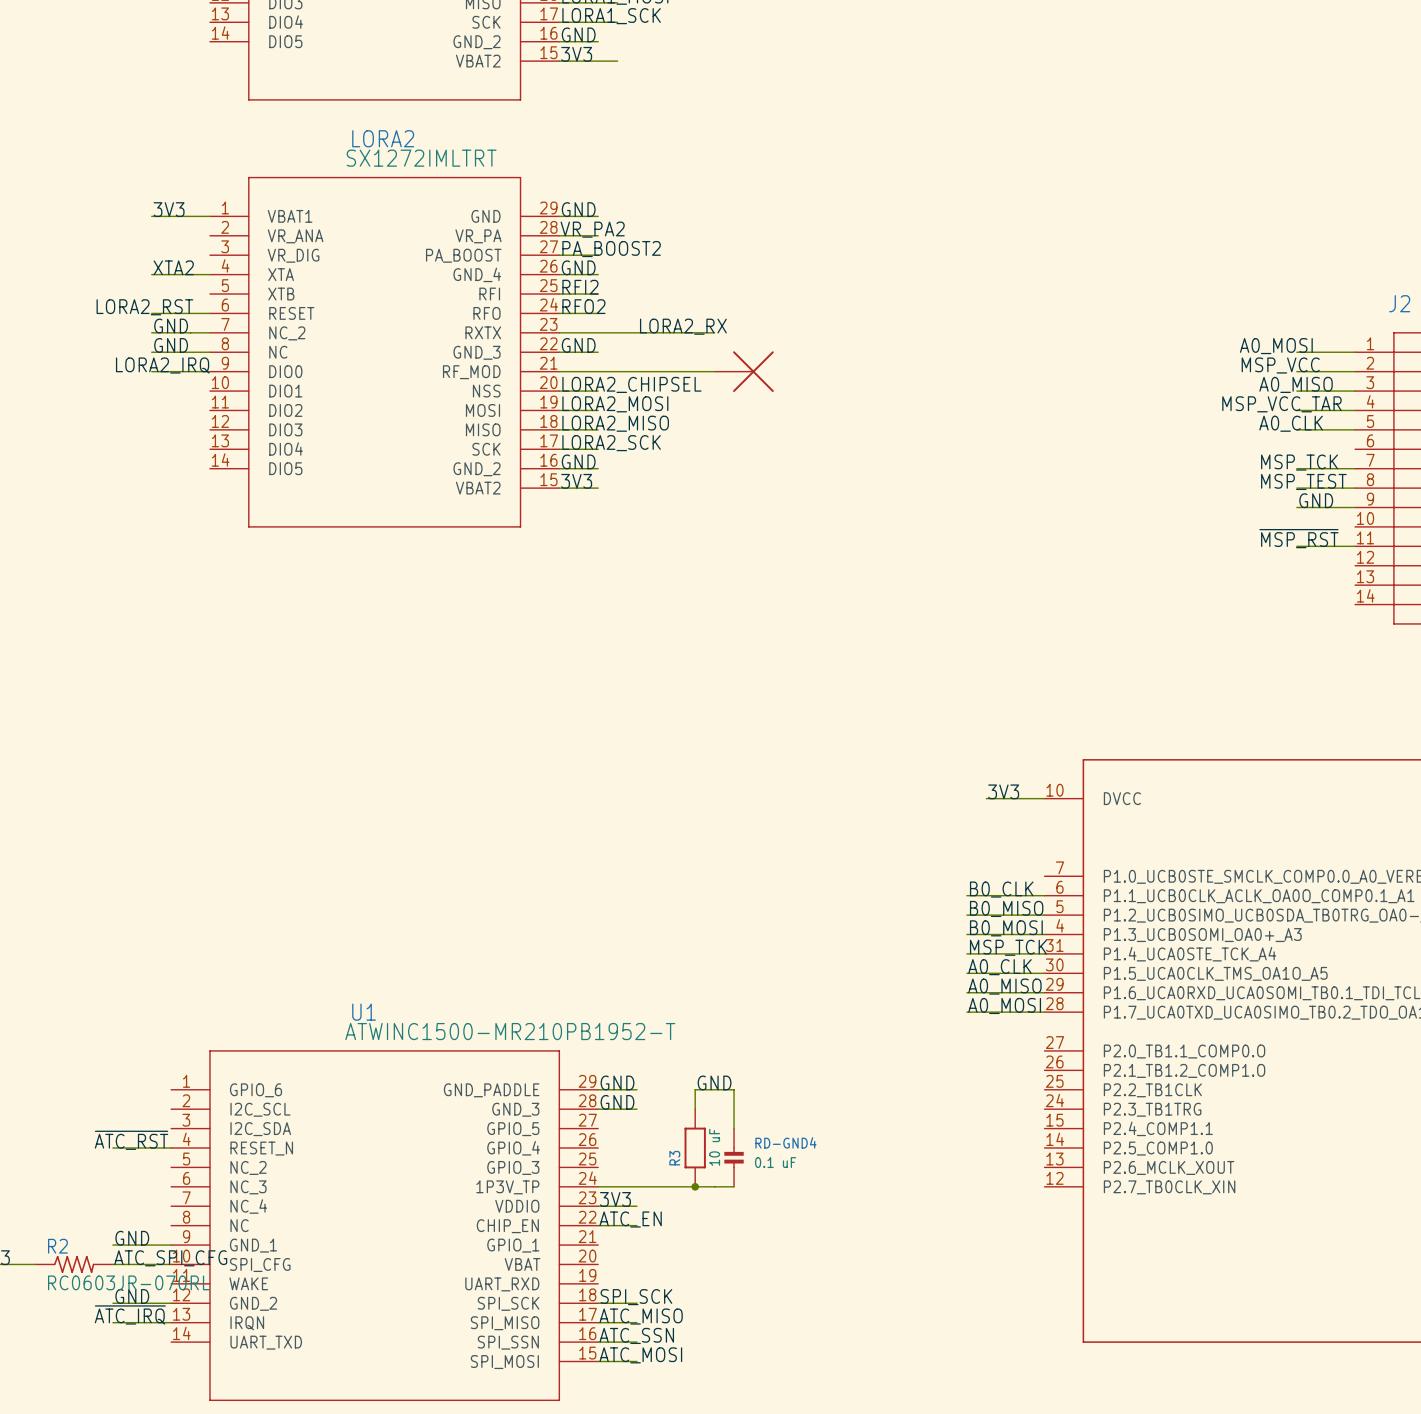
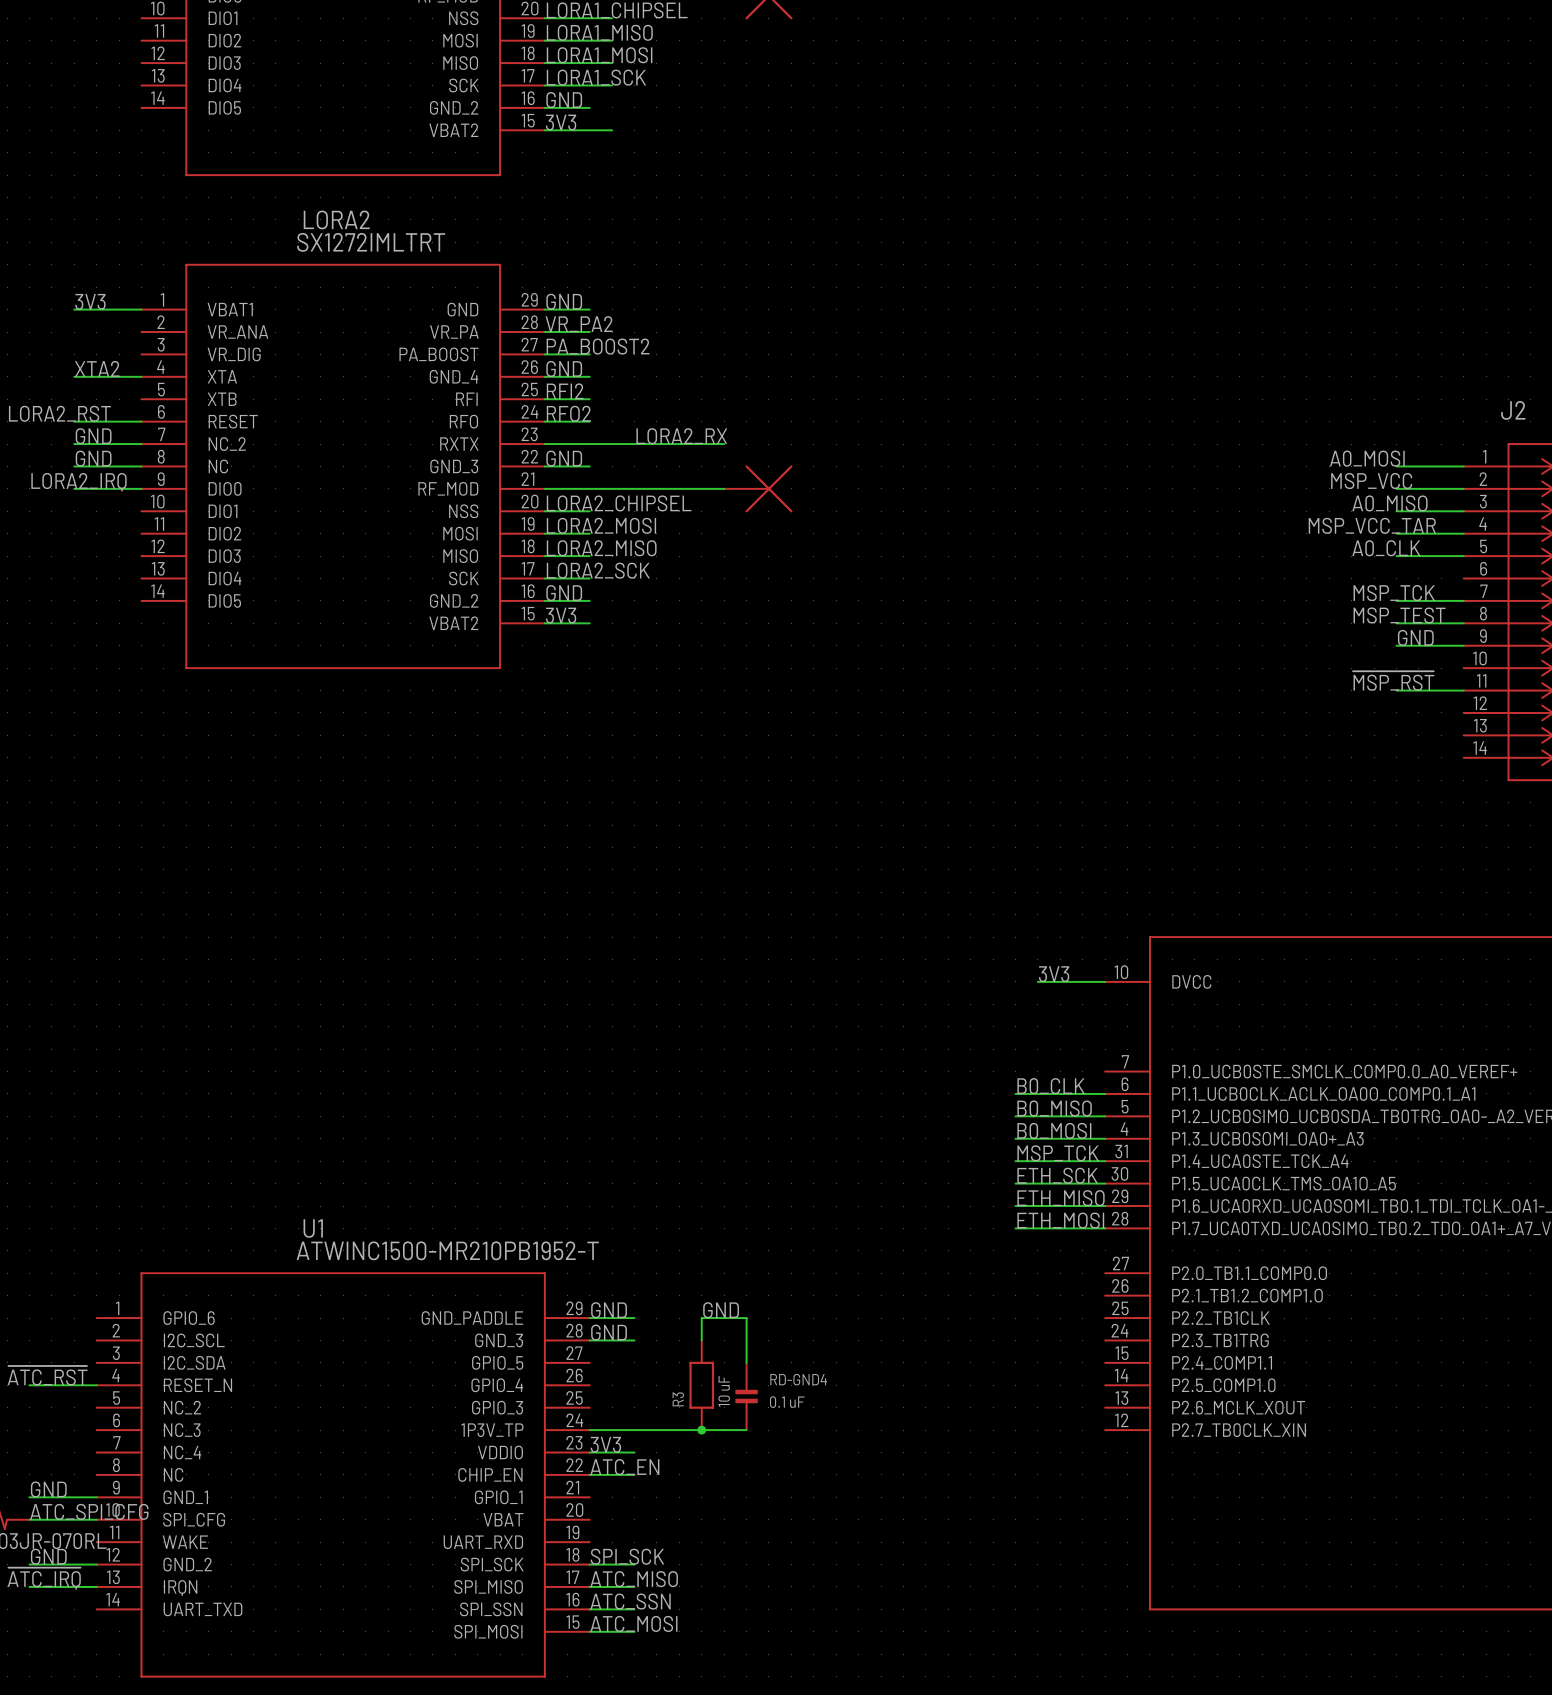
label: A0_CLK (999, 967) -> ETH_SCK (1057, 1175)
label: A0_MISO (1004, 986) -> ETH_MISO (1061, 1198)
label: A0_MOSI (1004, 1005) -> ETH_MOSI (1060, 1220)

